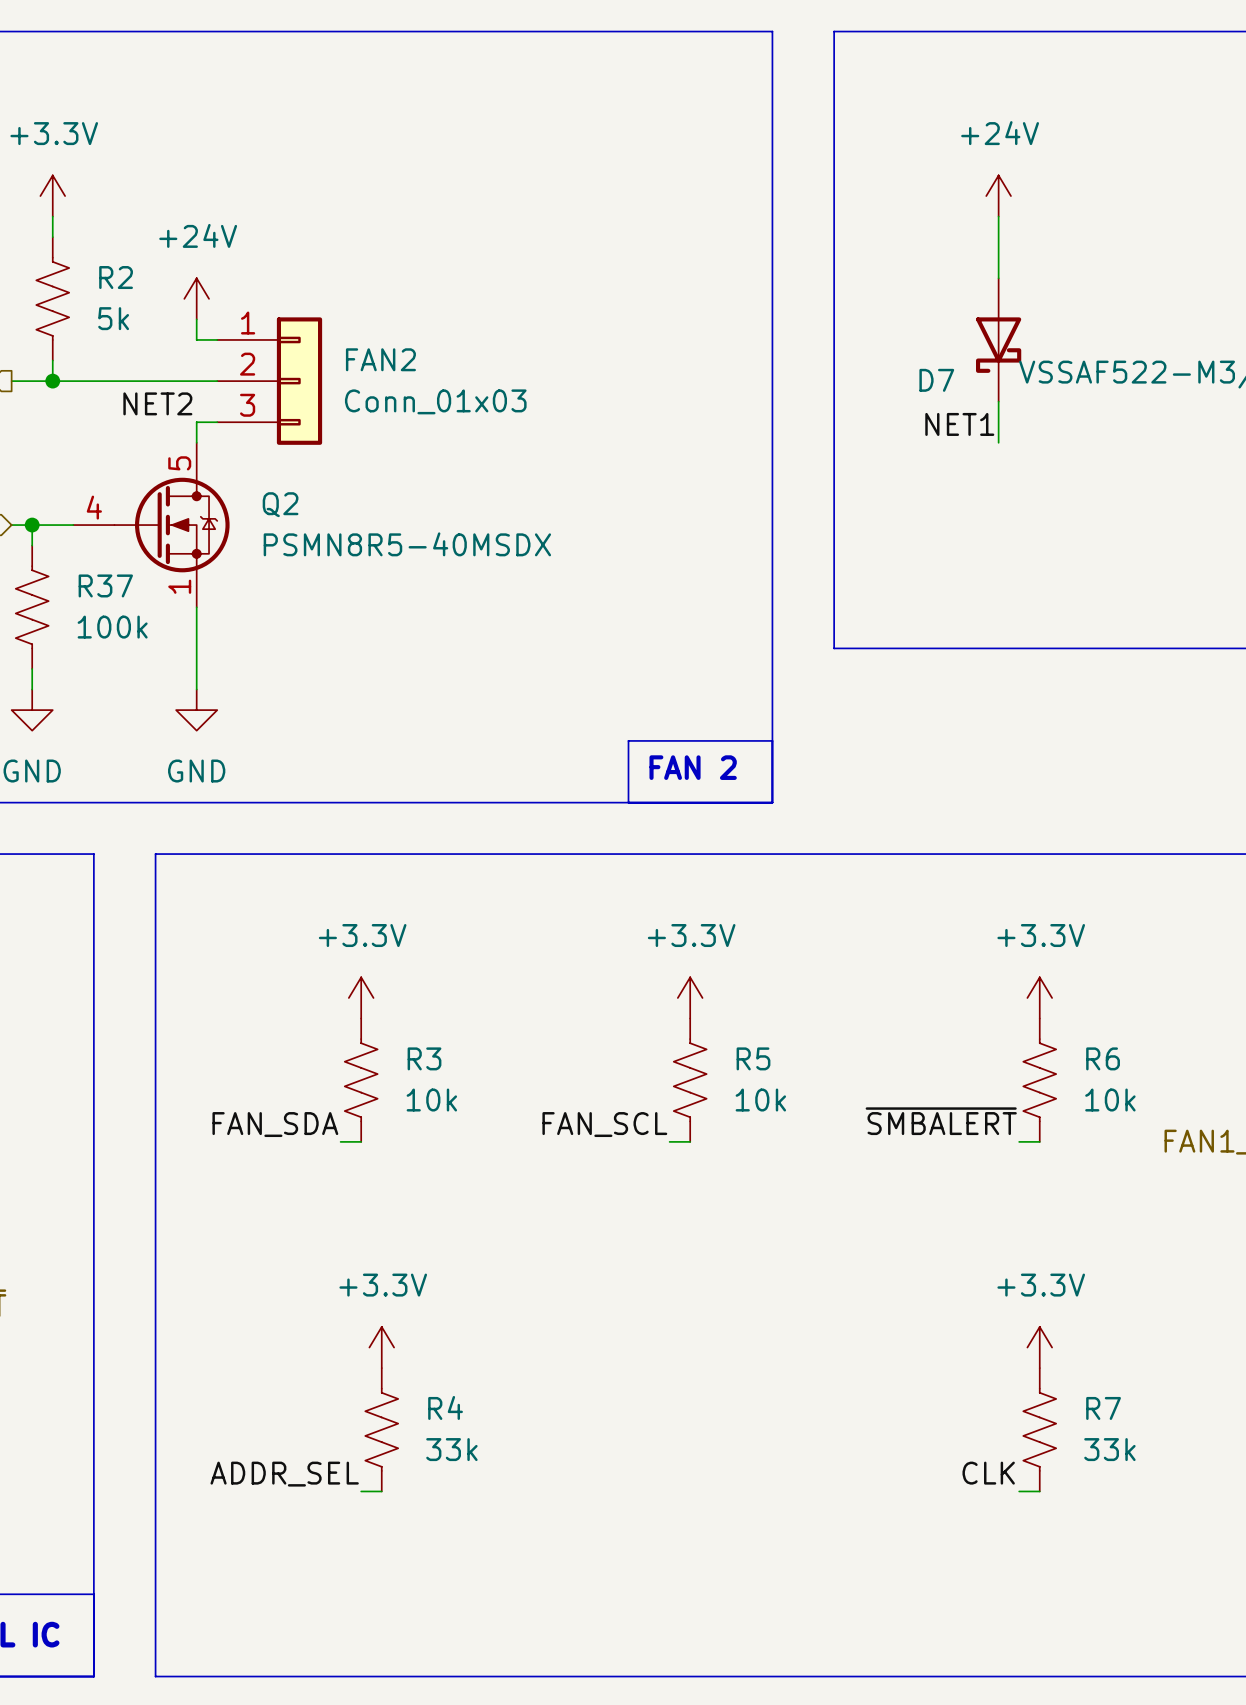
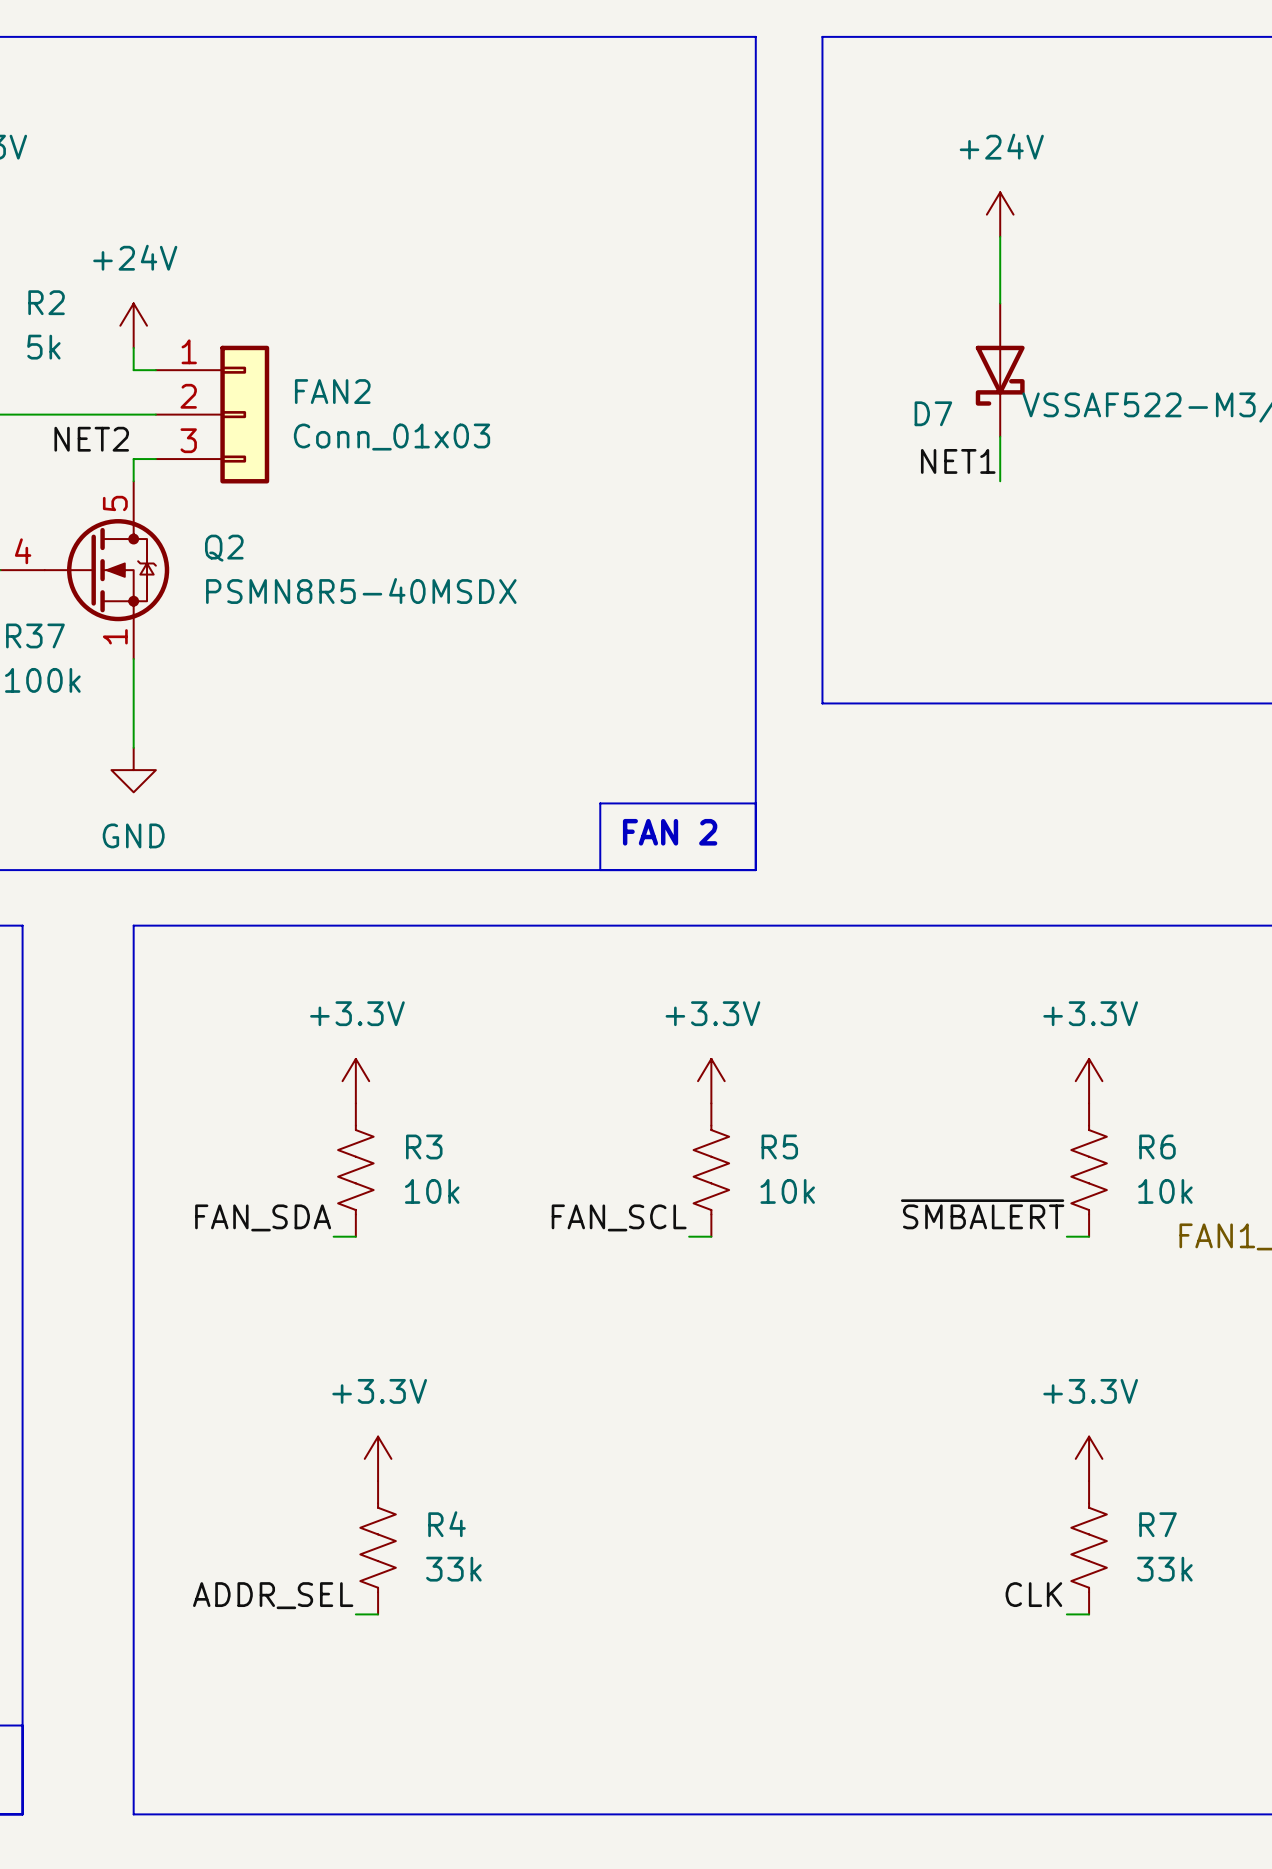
line: (196, 854) (155, 854) (155, 1676) (196, 1676) -> (133, 925) (133, 1814)
power symbol position: +3.3V (361, 997) -> +3.3V (355, 1081)
power symbol position: +3.3V (690, 997) -> +3.3V (711, 1081)
power symbol position: +3.3V (1039, 997) -> +3.3V (1089, 1081)
R3 position: (361, 1080) -> (355, 1170)
R5 position: (690, 1080) -> (711, 1170)
R6 position: (1039, 1080) -> (1089, 1170)
label position: ~{SMBALERT} (941, 1121) -> ~{SMBALERT} (982, 1214)
label position: FAN_SDA (275, 1124) -> FAN_SDA (263, 1217)
label position: FAN_SCL (604, 1124) -> FAN_SCL (619, 1217)
wire: (340, 1141) (361, 1141) -> (333, 1236) (355, 1236)
wire: (669, 1141) (690, 1141) -> (689, 1236) (711, 1236)
wire: (1019, 1141) (1039, 1141) -> (1066, 1236) (1089, 1236)
power symbol position: +3.3V (381, 1347) -> +3.3V (378, 1458)
power symbol position: +3.3V (1039, 1347) -> +3.3V (1089, 1458)
R4 position: (381, 1429) -> (378, 1547)
R7 position: (1039, 1429) -> (1089, 1547)
label position: CLK (988, 1473) -> CLK (1033, 1594)
label position: ADDR_SEL (284, 1474) -> ADDR_SEL (273, 1595)
wire: (361, 1491) (381, 1491) -> (355, 1614) (378, 1614)
wire: (1019, 1491) (1039, 1491) -> (1066, 1614) (1089, 1614)

